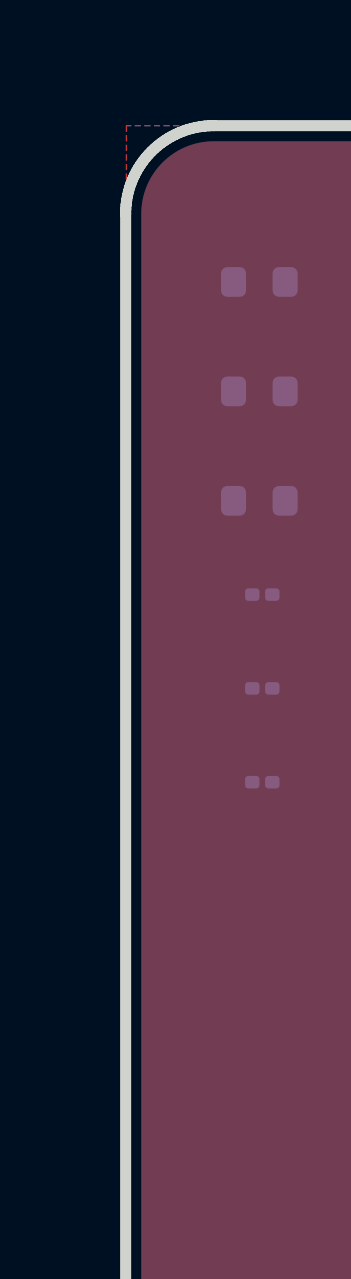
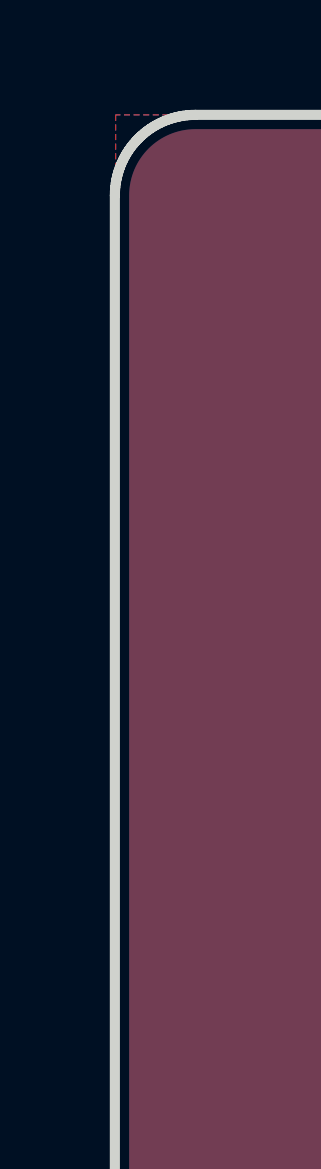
part: (259, 281) -> none
part: (259, 391) -> none
part: (259, 500) -> none
part: (262, 594) -> none
part: (262, 688) -> none
part: (262, 782) -> none

